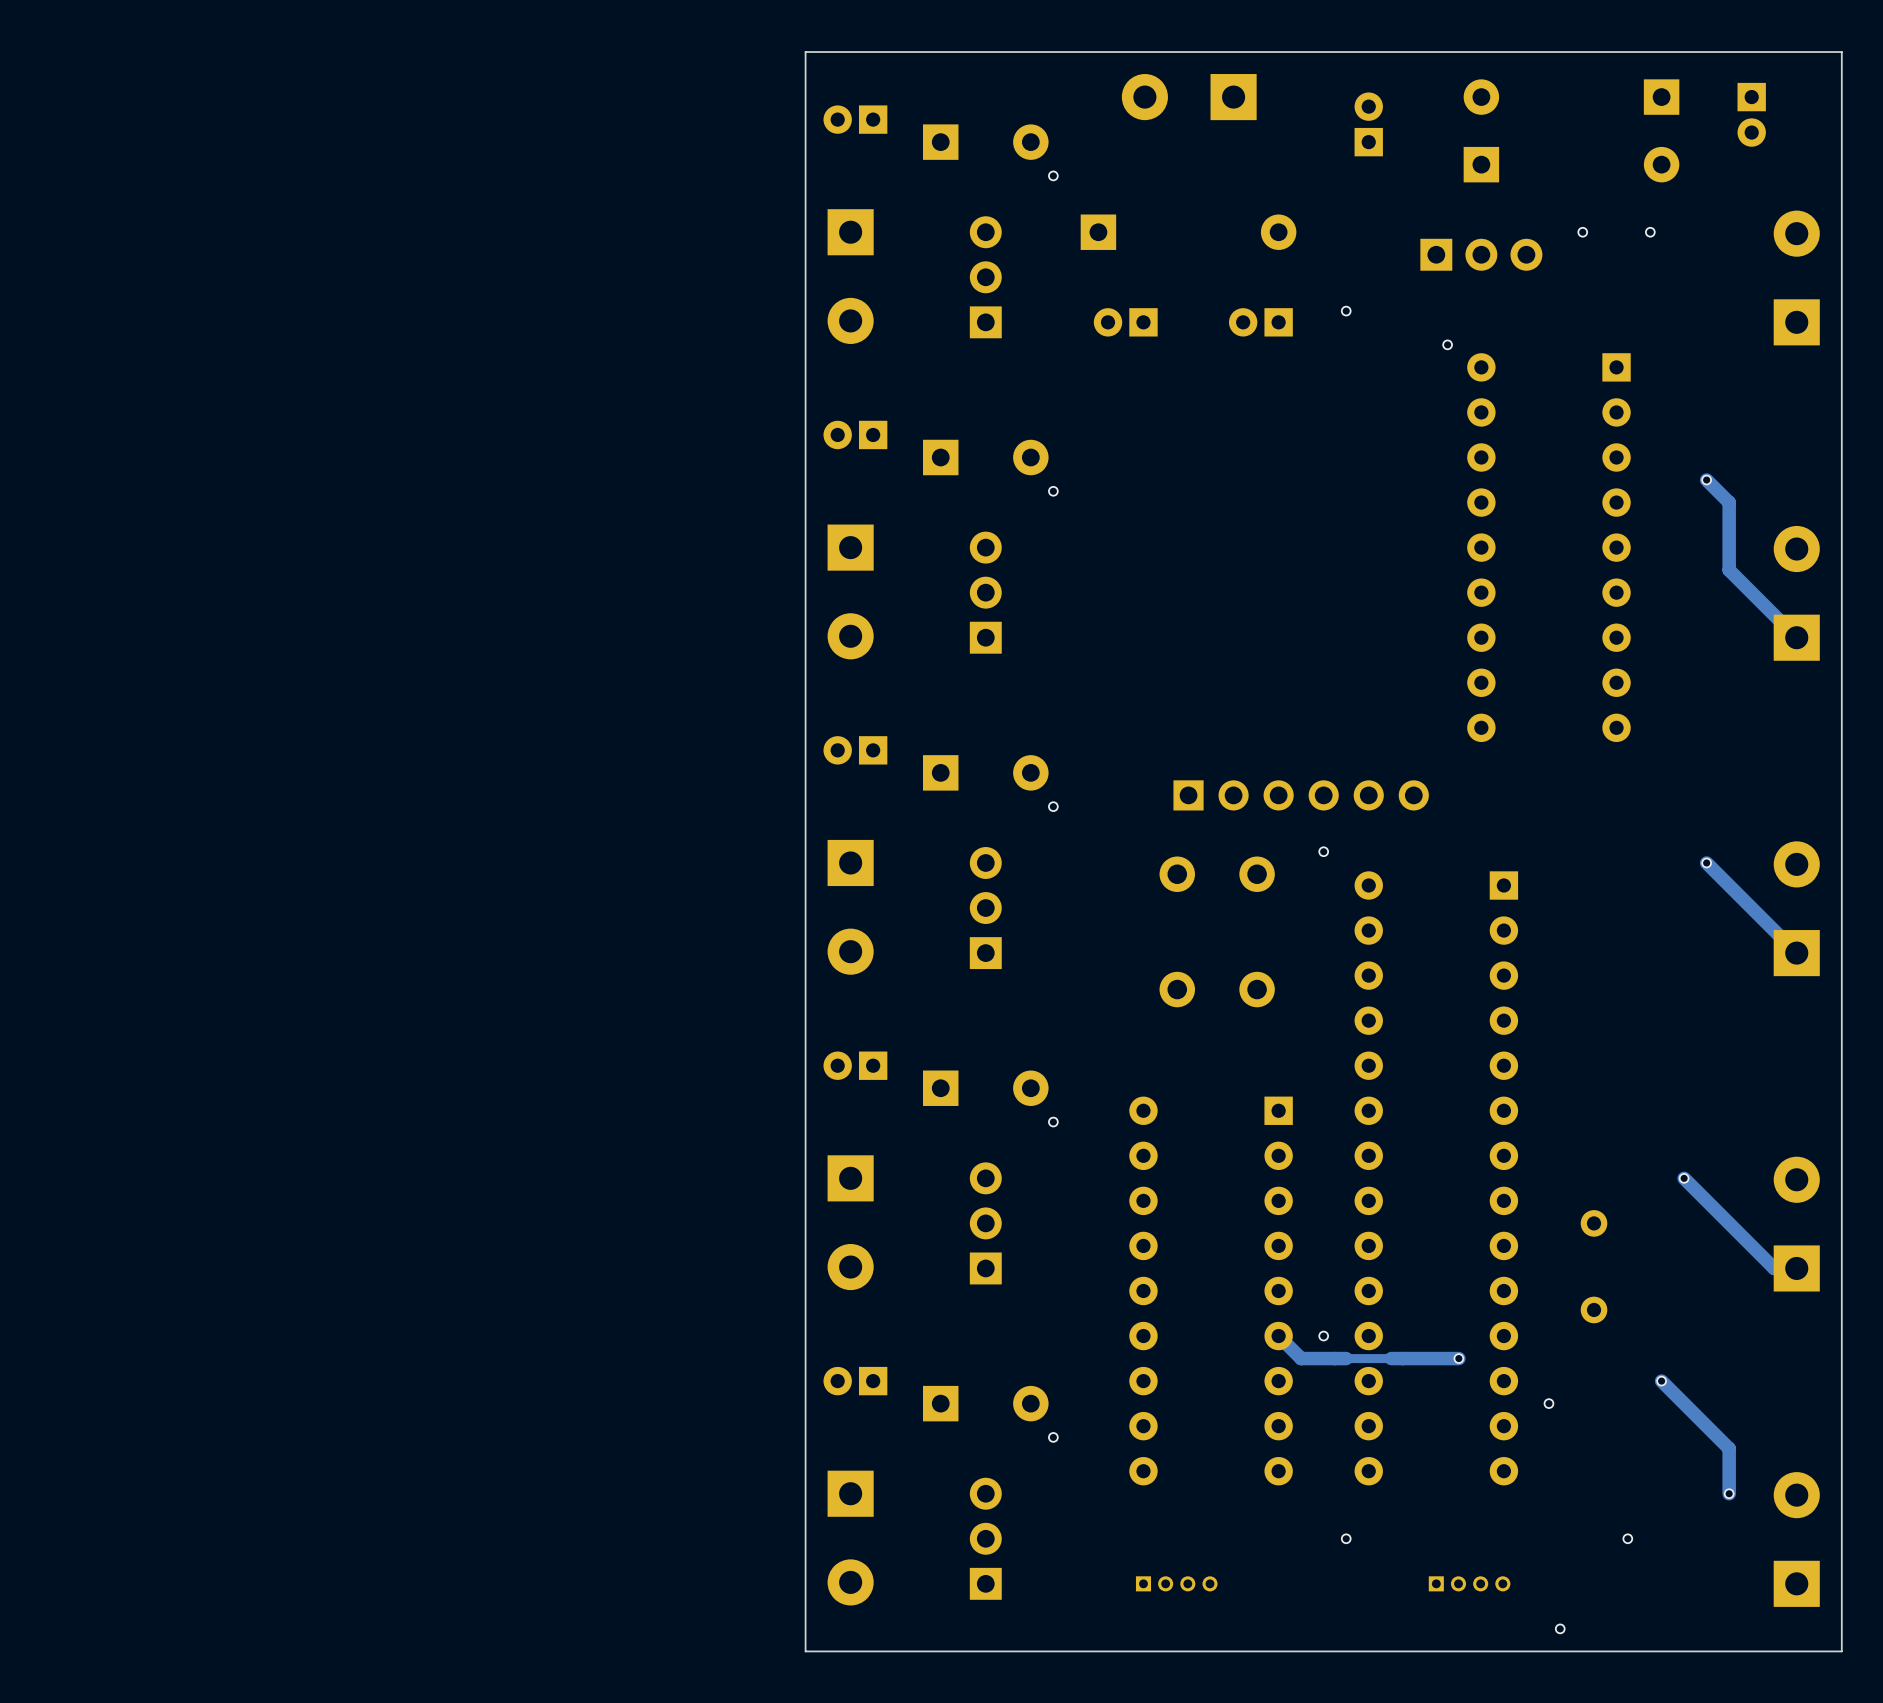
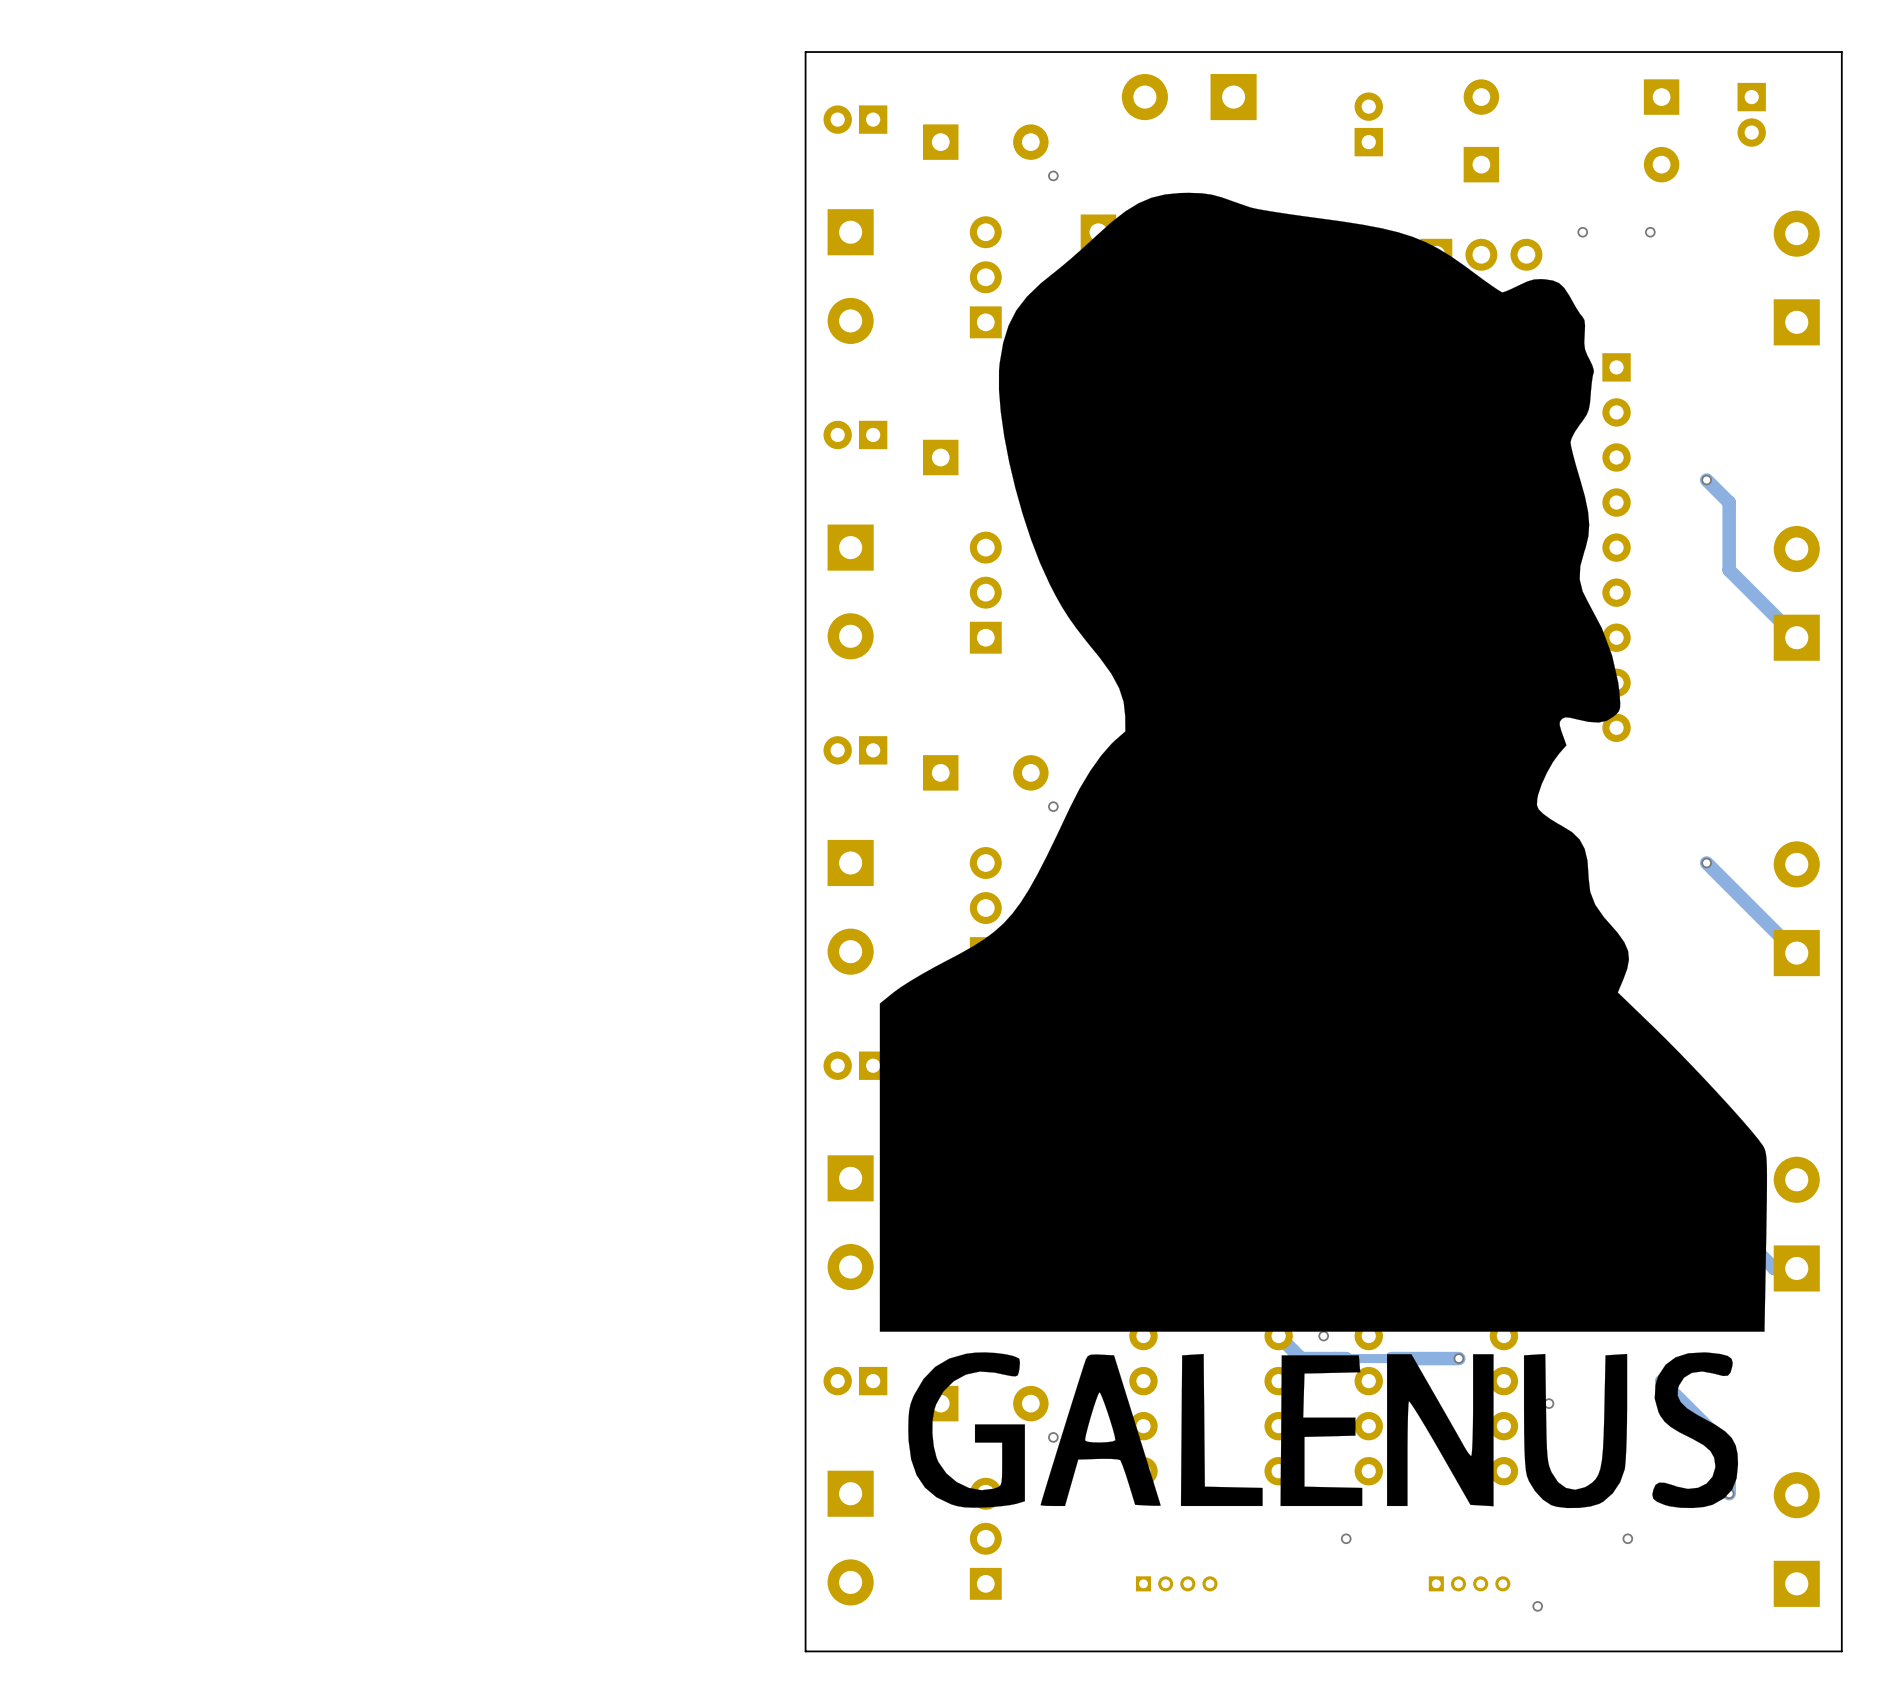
drawing: none -> [879, 192, 1768, 1509]
via position: (1560, 1628) -> (1537, 1606)

